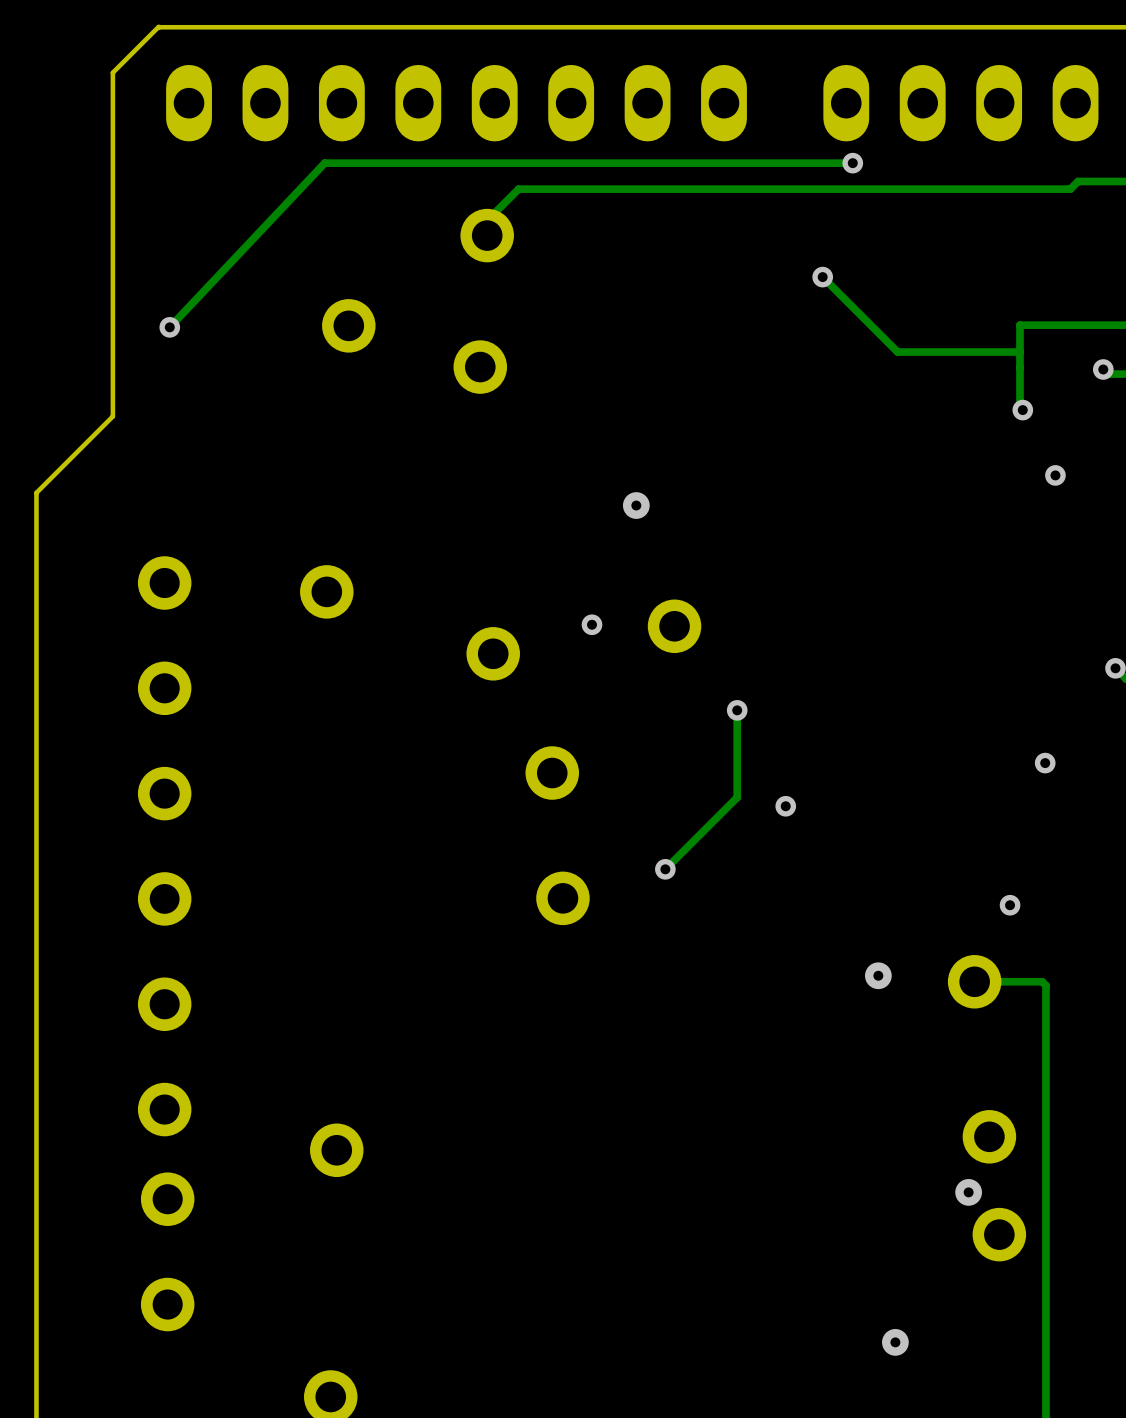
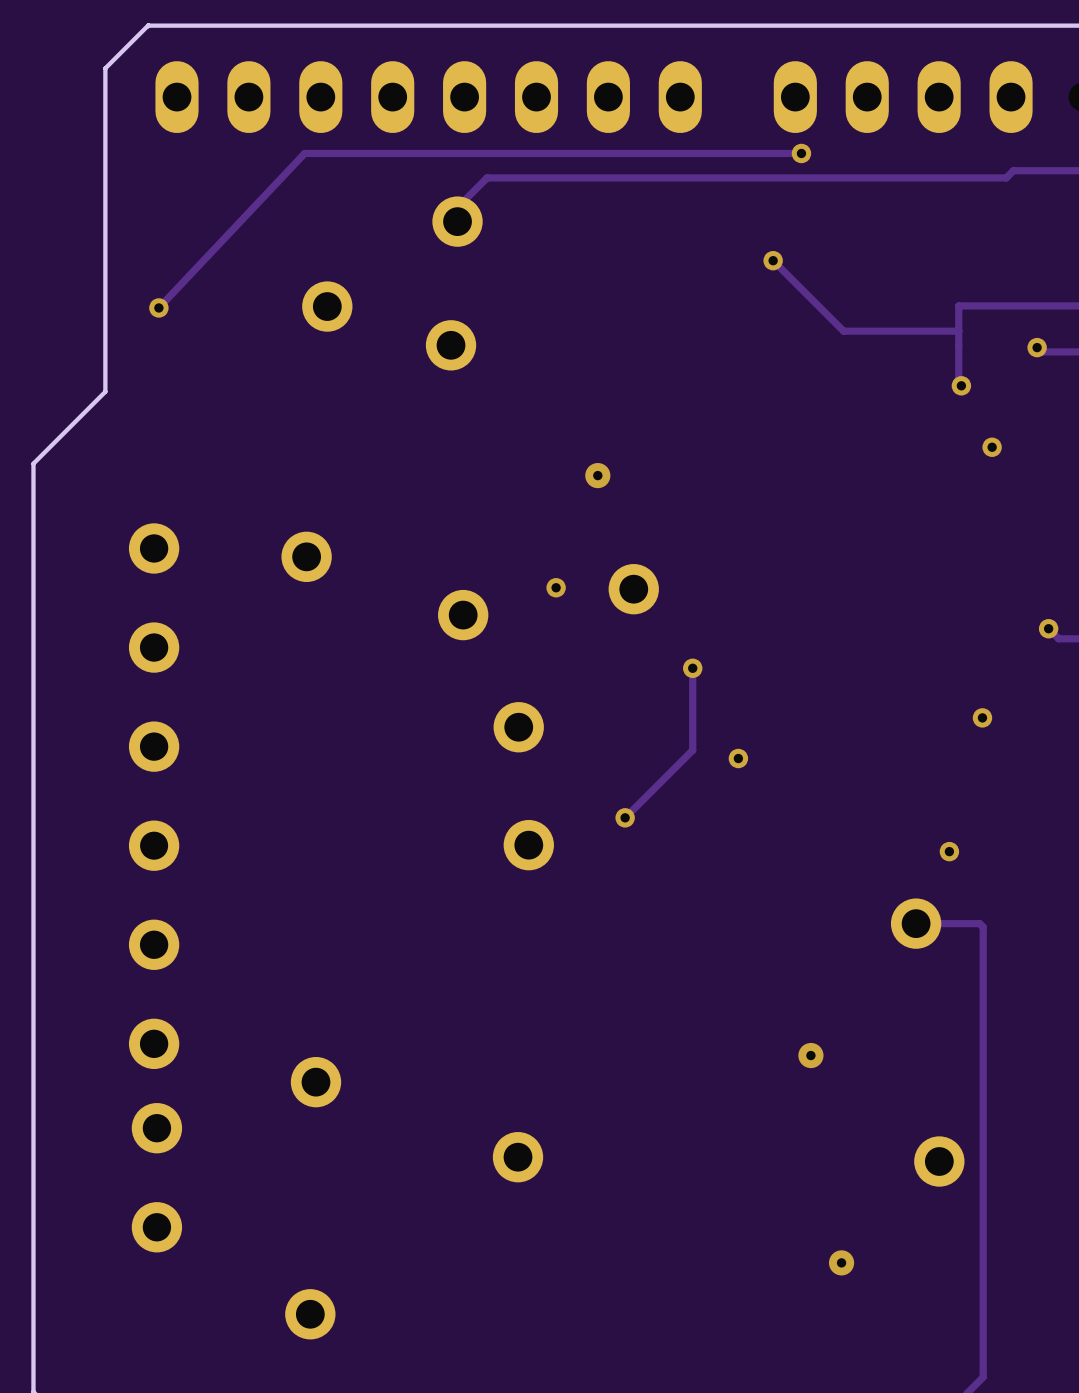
via: (878, 975) -> none
via: none -> (810, 1055)
part position: (989, 1136) -> (518, 1157)
via: (968, 1192) -> none

